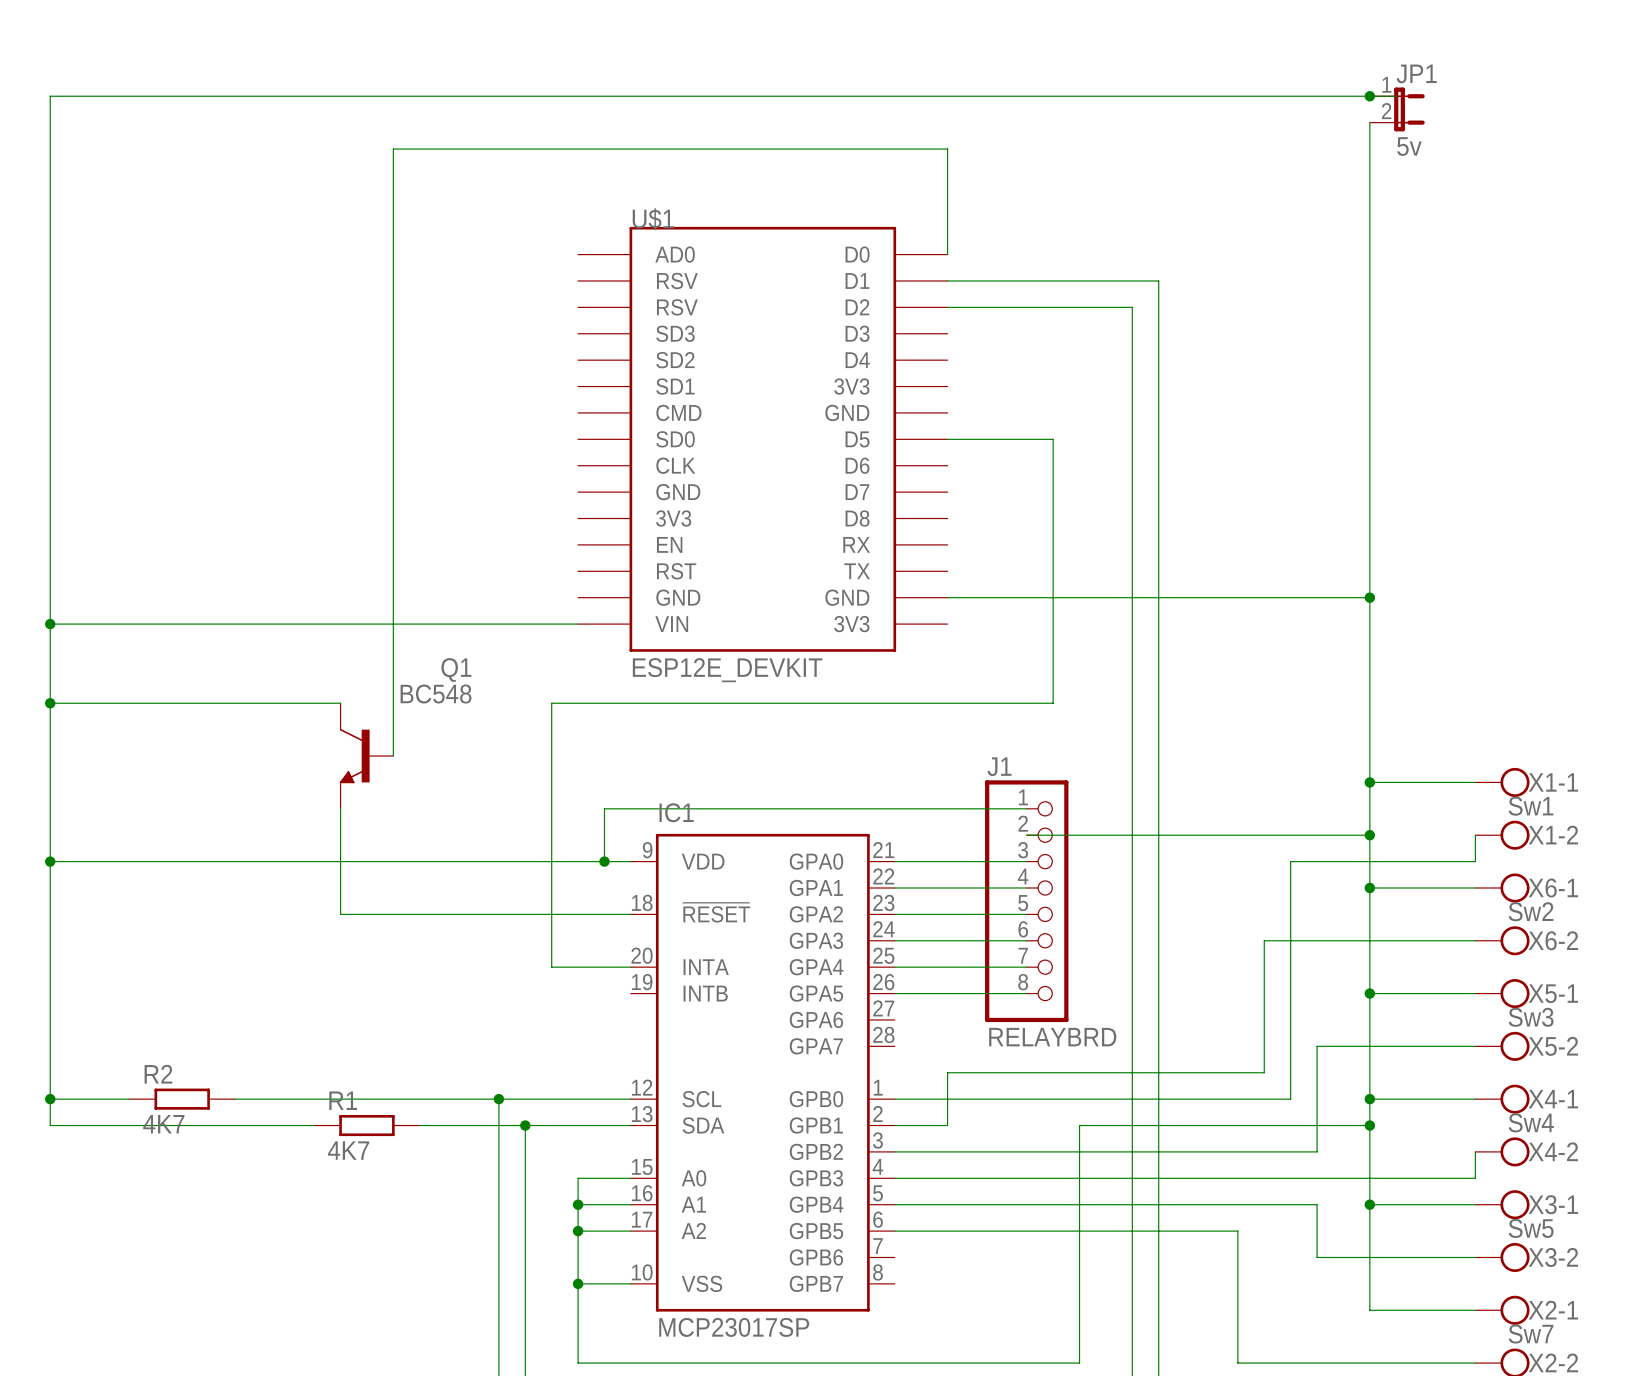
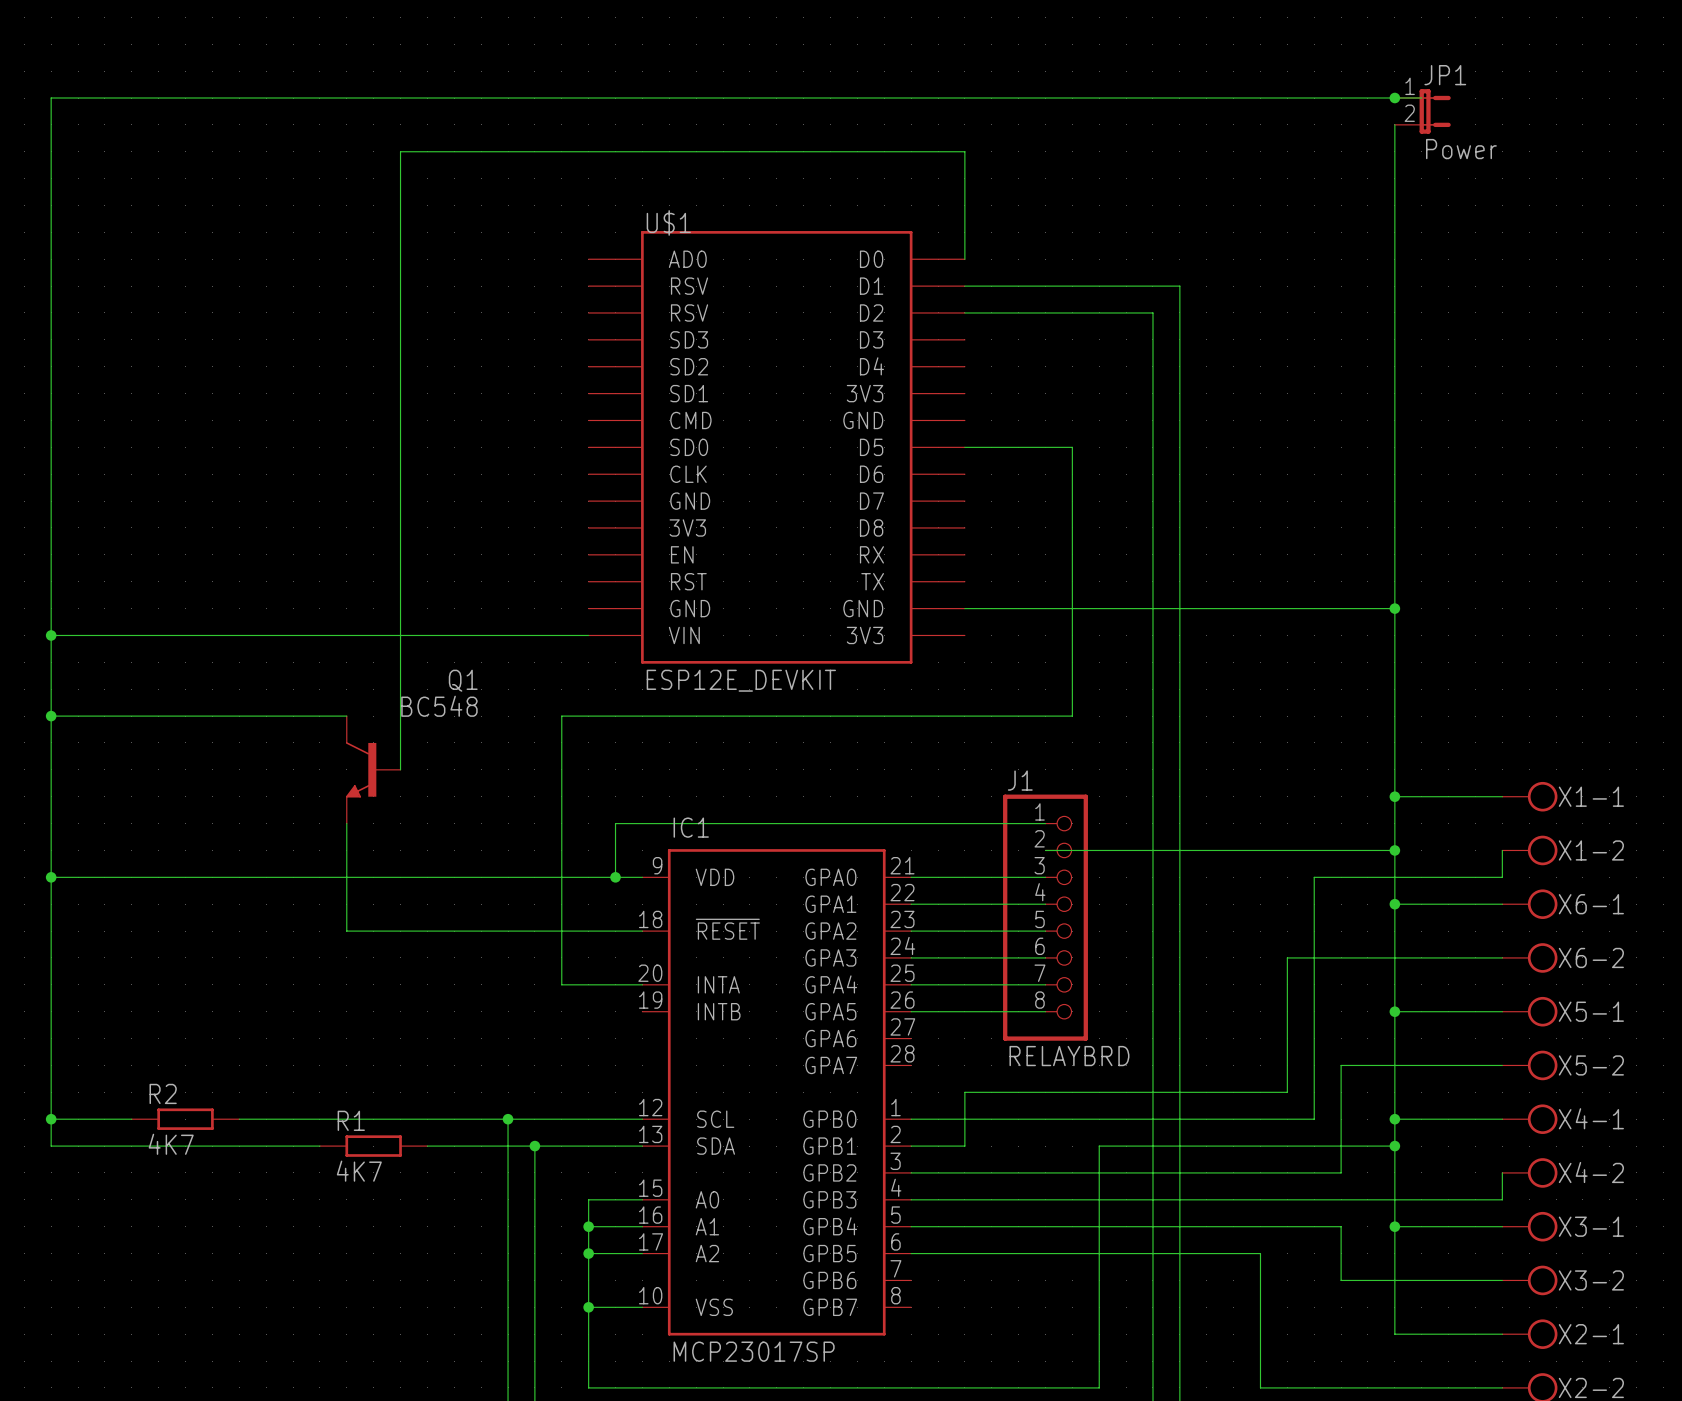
JP1 value: 5v (1409, 146) -> Power (1461, 149)
X1-2 value: Sw1 (1531, 806) -> none
X6-2 value: Sw2 (1531, 911) -> none
X5-2 value: Sw3 (1531, 1017) -> none
X4-2 value: Sw4 (1531, 1122) -> none
X3-2 value: Sw5 (1531, 1228) -> none
X2-2 value: Sw7 (1531, 1334) -> none

